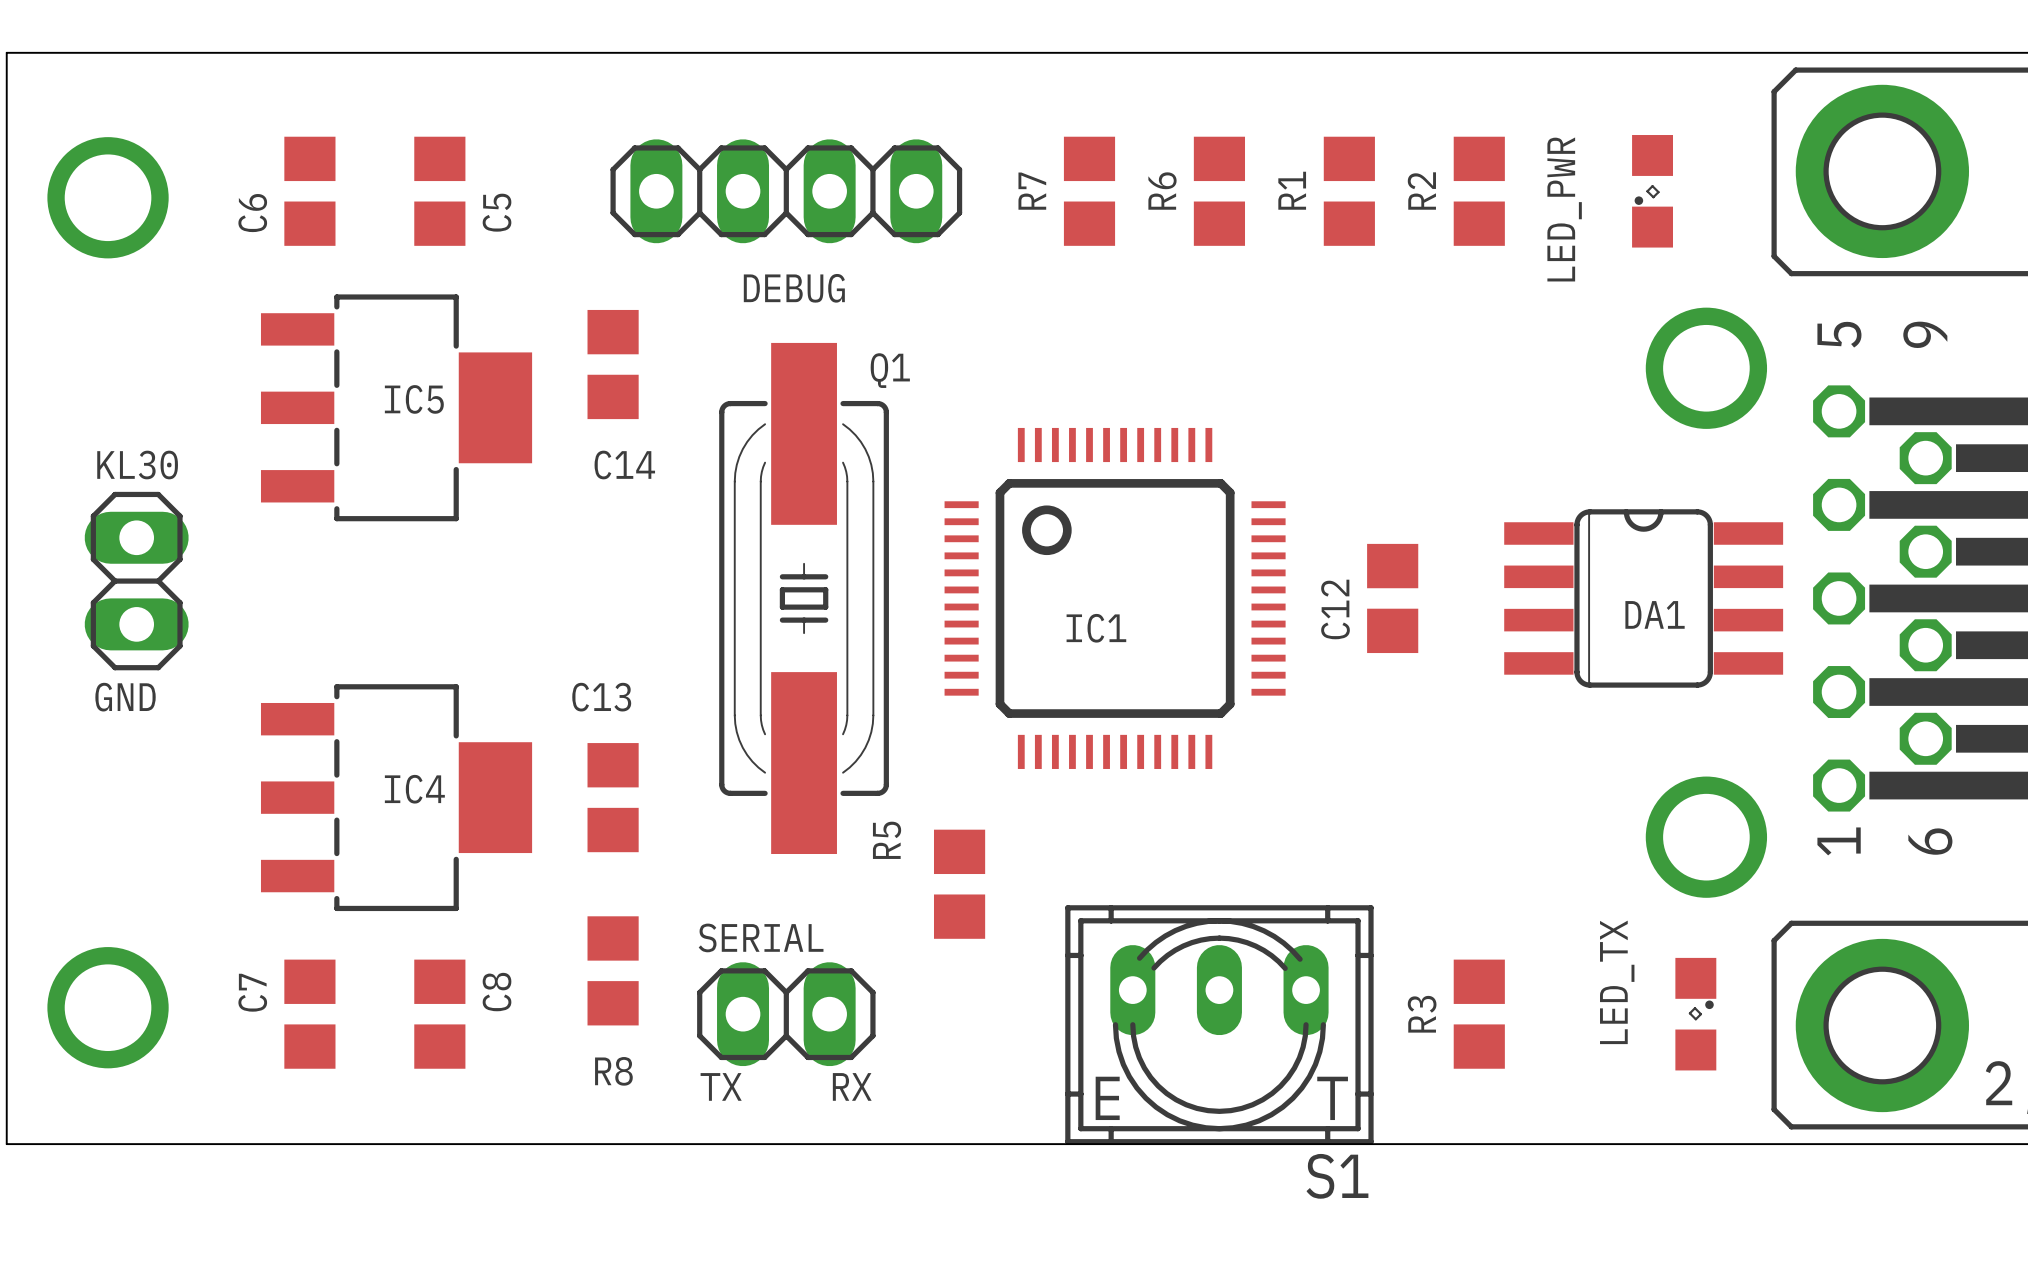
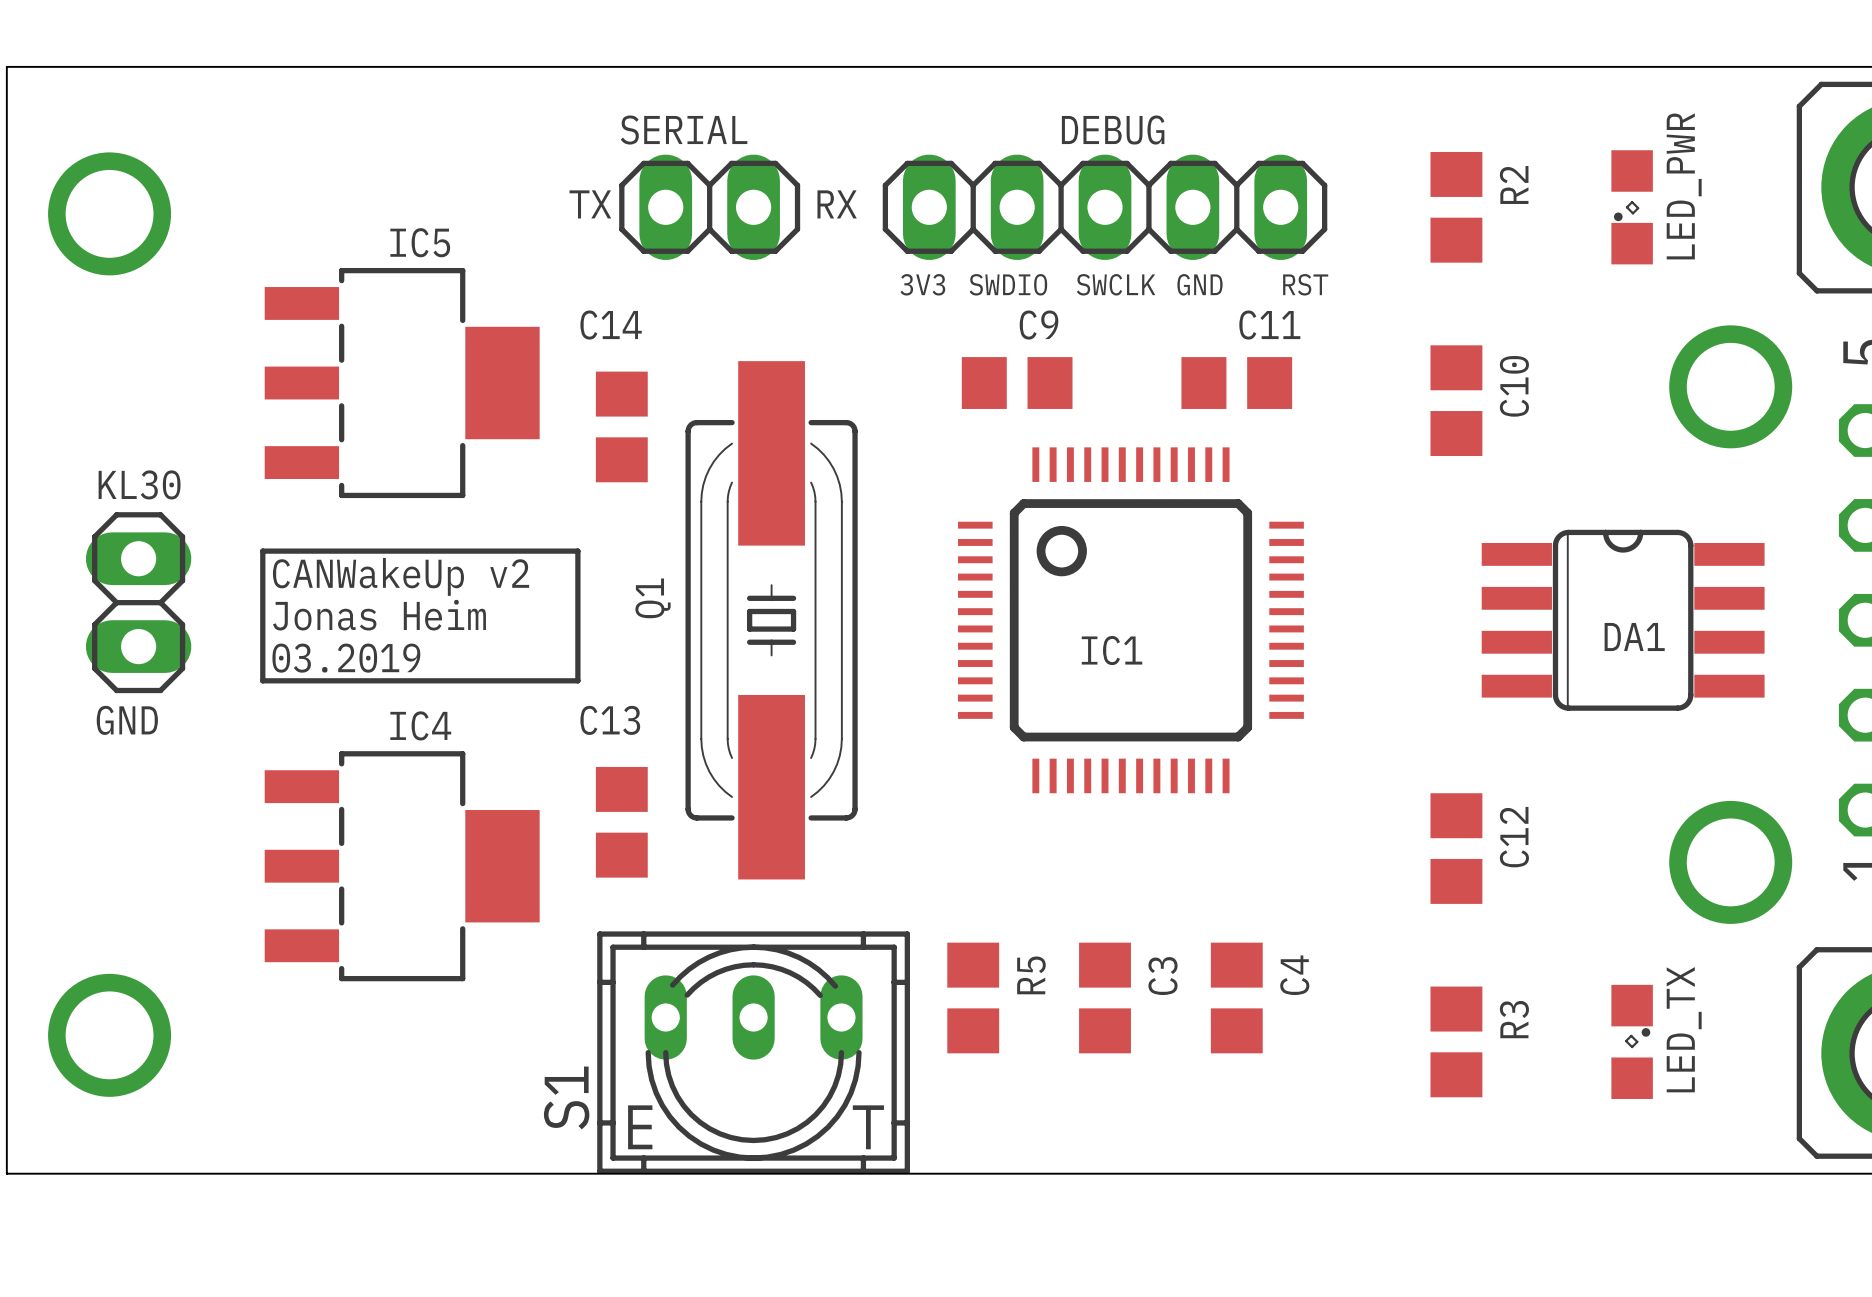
text: none -> TX (590, 204)
text: none -> RX (837, 204)
C6: (309, 191) -> none
C5: (439, 191) -> none
DEBUG: (786, 191) -> none
R7: (1089, 191) -> none
DEBUG: none -> (1105, 207)
R6: (1219, 191) -> none
R1: (1349, 191) -> none
R2 name position: R2 (1421, 191) -> R2 (1514, 184)
R2 position: (1479, 191) -> (1456, 207)
LED_PWR position: (1652, 191) -> (1632, 207)
LED_PWR name position: LED_PWR (1564, 209) -> LED_PWR (1684, 186)
text: none -> 3V3 (922, 284)
text: none -> SWDIO (1008, 284)
text: none -> SWCLK (1116, 284)
text: none -> GND (1200, 284)
text: none -> RST (1305, 284)
C14 position: (613, 364) -> (621, 426)
C9: none -> (1017, 383)
C11: none -> (1236, 383)
Q1 name rotation: 0° (890, 370) -> 90° counterclockwise (653, 598)
Q1 name position: Q1 (890, 370) -> Q1 (653, 598)
C10: none -> (1456, 400)
IC5 name position: IC5 (414, 399) -> IC5 (420, 242)
IC5 position: (396, 407) -> (402, 383)
C14 name position: C14 (624, 465) -> C14 (611, 325)
line: none -> (262, 551) (262, 680) (577, 680) (577, 551) (262, 551)
text: none -> CANWakeUp v2 (401, 576)
text: none -> Jonas Heim (379, 615)
Q1 position: (804, 598) -> (771, 620)
C12 position: (1392, 598) -> (1456, 848)
DA1 position: (1643, 598) -> (1623, 620)
C12 name position: C12 (1335, 609) -> C12 (1514, 837)
text: none -> 03.2019 (346, 658)
IC4 name position: IC4 (414, 789) -> IC4 (420, 725)
IC4 position: (396, 797) -> (402, 866)
R5 name position: R5 (887, 840) -> R5 (1031, 975)
R5 position: (959, 884) -> (973, 997)
S1 footprint: [1065, 905, 1374, 1145] -> [597, 931, 910, 1174]
R8: (613, 970) -> none
C3: none -> (1105, 997)
C4: none -> (1236, 997)
LED_TX name position: LED_TX (1617, 982) -> LED_TX (1684, 1029)
C7: (309, 1014) -> none
C8: (439, 1014) -> none
SERIAL position: (786, 1014) -> (709, 207)
R3 name position: R3 (1422, 1014) -> R3 (1514, 1019)
R3 position: (1479, 1014) -> (1456, 1041)
LED_TX position: (1695, 1014) -> (1632, 1041)
text: TX (721, 1086) -> none
text: RX (852, 1086) -> none
S1 name position: S1 (1337, 1176) -> S1 (566, 1097)

